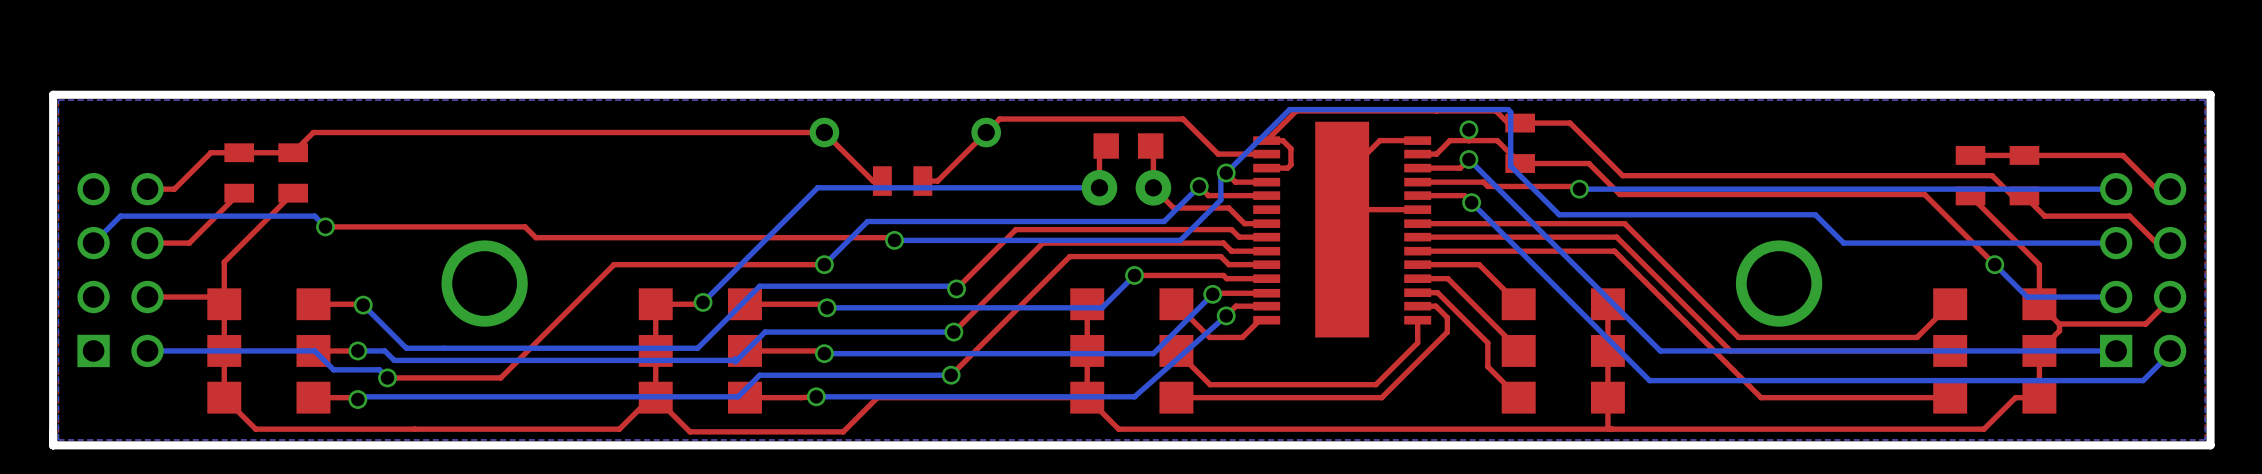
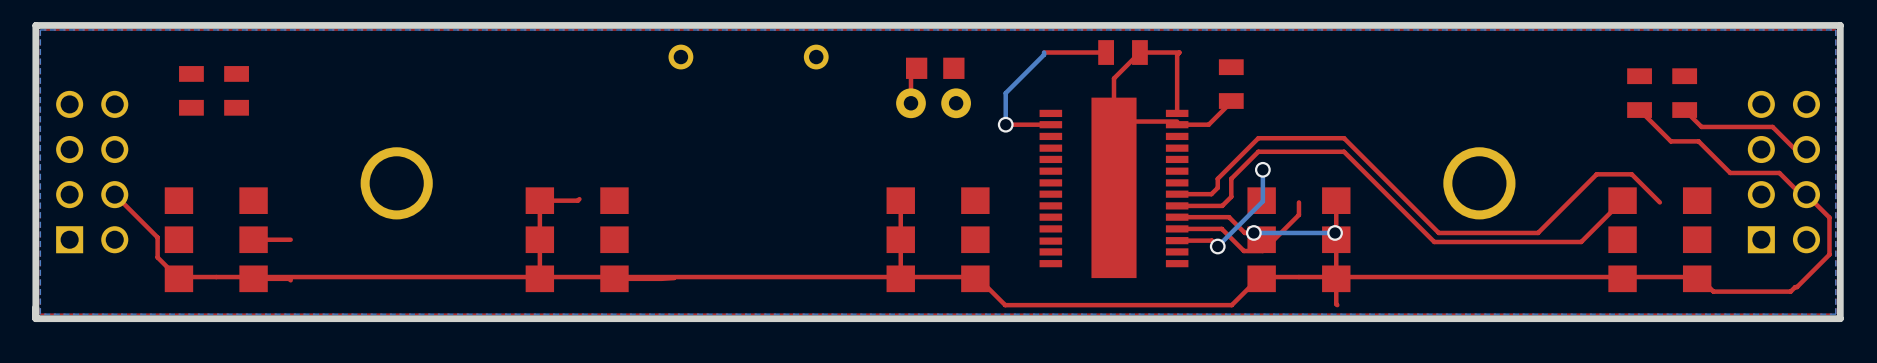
bottom track: none -> (1044, 52) (1044, 54) (1005, 93) (1005, 124)
top track: none -> (1106, 52) (1044, 52)
part: none -> (1123, 52)
via: (1468, 129) -> none
top track: (1417, 140) (1379, 140) (1342, 178) -> (1177, 113) (1177, 54) (1179, 52) (1139, 52) (1114, 78) (1114, 95)
part position: (1520, 143) -> (1231, 84)
top track: (1150, 146) (1153, 148) (1153, 187) (1173, 208) (1228, 208) (1244, 223) (1266, 223) -> none
top track: (1266, 154) (1218, 154) (1183, 119) (999, 119) (937, 181) (922, 181) -> none
top track: (1417, 154) (1436, 154) (1450, 140) (1497, 140) (1520, 163) (1588, 163) (1619, 194) (1924, 194) (1994, 264) -> none
top track: (1970, 155) (2122, 155) (2156, 189) (2170, 189) -> none
top track: (1468, 159) (1460, 168) (1417, 168) -> none
bottom track: (1468, 159) (1660, 350) (2116, 350) -> none
via: (1468, 159) -> none
top track: (1266, 168) (1287, 168) (1290, 164) (1290, 148) (1282, 140) (1266, 140) (1296, 110) (1495, 110) (1508, 123) (1570, 123) (1622, 175) (1992, 175) (2012, 195) (2024, 195) -> none
top track: (1226, 172) (1235, 182) (1266, 182) -> none
via: (1226, 172) -> none
top track: (882, 181) (872, 181) (824, 132) (313, 132) (293, 152) (210, 152) (174, 189) (147, 189) -> none
part: (902, 181) -> none
top track: (1417, 182) (1483, 182) (1487, 186) (1576, 186) (1579, 189) -> none
top track: none -> (1231, 101) (1208, 124) (1177, 124)
top track: (1199, 186) (1208, 195) (1266, 195) -> none
bottom track: (1199, 186) (1164, 221) (867, 221) (824, 264) -> none
via: (1199, 186) -> none
bottom track: (1099, 187) (817, 187) (703, 302) -> none
via: (1579, 189) -> none
bottom track: (2116, 189) (1579, 189) -> none
top track: (239, 193) (189, 243) (147, 243) -> none
top track: (293, 193) (224, 262) (224, 397) (255, 429) (619, 429) (650, 397) (655, 397) (689, 431) (843, 431) (877, 397) (1087, 397) (1118, 429) (1212, 429) -> (114, 194) (157, 237) (157, 257) (177, 277) (977, 277) (1005, 305)
top track: (1417, 195) (1464, 195) (1471, 202) -> none
bottom track: (1471, 202) (1649, 380) (2143, 380) (2170, 353) (2170, 350) -> none
via: (1471, 202) -> none
via: none -> (1005, 124)
top track: none -> (1050, 124) (1005, 124)
top track: (1417, 223) (1624, 223) (1738, 337) (1916, 337) -> (1177, 205) (1222, 205) (1231, 196) (1231, 178) (1258, 151) (1344, 151) (1434, 241) (1581, 241) (1594, 228)
top track: (325, 226) (525, 226) (535, 237) (891, 237) (894, 240) -> none
bottom track: (325, 226) (314, 216) (120, 216) (93, 243) -> none
via: (325, 226) -> none
part position: (1342, 229) -> (1114, 187)
top track: (2008, 233) (2039, 264) (2039, 304) (2059, 323) (2145, 323) (2170, 299) (2170, 297) -> none
top track: (1266, 237) (1239, 237) (1231, 229) (1015, 229) (956, 288) -> none
top track: (1417, 237) (1616, 237) (1730, 350) (1950, 350) -> none
bottom track: (894, 240) (1180, 240) (1220, 199) (1220, 178) (1289, 109) (1508, 109) (1510, 112) (1510, 166) (1559, 214) (1815, 214) (1843, 243) (2116, 243) -> none
via: (894, 240) -> none
top track: (1266, 251) (1231, 251) (1223, 243) (1042, 243) (953, 332) -> none
top track: (1417, 251) (1614, 251) (1761, 397) (1950, 397) -> none
top track: (824, 264) (614, 264) (500, 377) (387, 377) -> none
via: (824, 264) -> none
top track: (1266, 264) (1228, 264) (1220, 256) (1069, 256) (951, 375) -> none
top track: (1417, 264) (1479, 264) (1518, 304) -> none
bottom track: (1994, 264) (2027, 297) (2116, 297) -> none
via: (1994, 264) -> none
bottom track: none -> (1262, 169) (1262, 201) (1217, 246)
via: none -> (1262, 169)
top track: (1134, 275) (1223, 275) (1226, 278) (1266, 278) -> none
bottom track: (1134, 275) (1102, 307) (827, 307) -> none
via: (1134, 275) -> none
top track: (1417, 278) (1447, 278) (1518, 350) -> none
bottom track: (956, 288) (953, 286) (759, 286) (697, 348) (406, 348) (363, 305) -> none
via: (956, 288) -> none
top track: (1417, 292) (1437, 292) (1487, 342) (1487, 366) (1518, 397) -> none
top track: (1266, 293) (1212, 294) -> none
bottom track: (1212, 294) (1153, 353) (824, 353) -> none
via: (1212, 294) -> none
top track: none -> (1177, 194) (1211, 194) (1217, 187) (1217, 178) (1258, 138) (1344, 138) (1438, 232) (1538, 232) (1596, 174) (1631, 174) (1659, 202)
top track: (147, 297) (217, 297) (224, 304) -> none
via: (703, 302) -> none
top track: (313, 304) (363, 305) -> none
top track: (744, 304) (823, 304) (827, 307) -> none
top track: (1176, 304) (1209, 337) (1242, 337) (1259, 320) (1266, 320) -> none
via: (363, 305) -> none
top track: (1266, 306) (1235, 306) (1226, 315) -> none
top track: (1417, 306) (1435, 306) (1447, 317) (1447, 332) (1381, 397) (1176, 397) -> none
top track: none -> (1298, 202) (1298, 214) (1262, 251) (1243, 251) (1221, 228) (1177, 228)
via: (827, 307) -> none
bottom track: (1226, 315) (1134, 396) (816, 396) -> none
via: (1226, 315) -> none
top track: (1417, 320) (1417, 342) (1375, 384) (1210, 384) (1176, 350) -> none
top track: none -> (1177, 217) (1229, 217) (1244, 232) (1253, 232)
top track: (2059, 323) (2059, 330) (2039, 350) (2039, 397) (2015, 397) (1984, 429) (1483, 429) -> (1670, 141) (1698, 141) (1730, 172) (1779, 172) (1801, 194) (1806, 194) (1829, 217) (1829, 254) (1790, 291) (1713, 291) (1698, 277) (1259, 277) (1231, 305)
bottom track: (953, 332) (765, 332) (735, 361) (735, 359) (736, 360) (394, 360) (384, 350) (357, 350) -> none
via: (953, 332) -> none
via: none -> (1253, 232)
bottom track: none -> (1335, 232) (1253, 232)
via: none -> (1335, 232)
bottom track: (147, 350) (314, 350) (333, 369) (379, 369) (387, 377) -> none
via: (357, 350) -> none
top track: (744, 350) (821, 350) (824, 353) -> none
top track: none -> (1177, 240) (1211, 240) (1217, 246)
via: (824, 353) -> none
via: none -> (1217, 246)
bottom track: (951, 375) (759, 375) (738, 396) (360, 396) (357, 399) -> none
via: (951, 375) -> none
via: (387, 377) -> none
via: (816, 396) -> none
via: (357, 399) -> none

